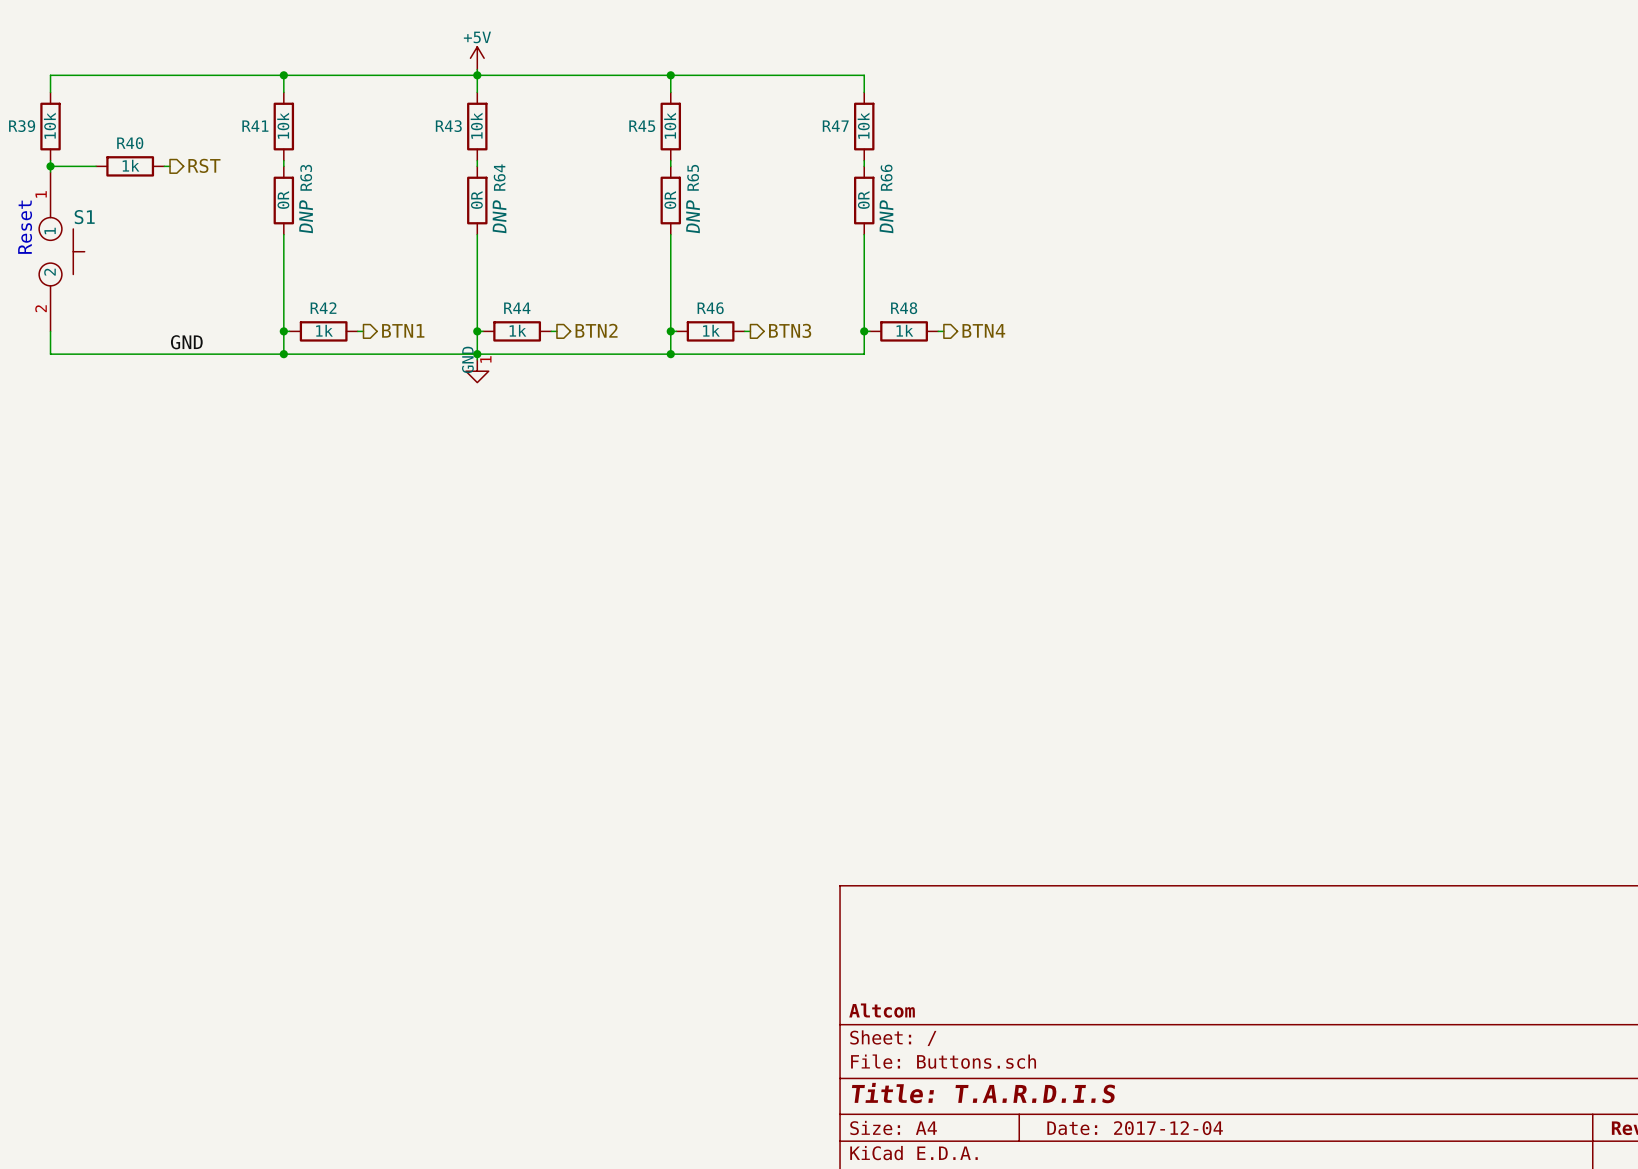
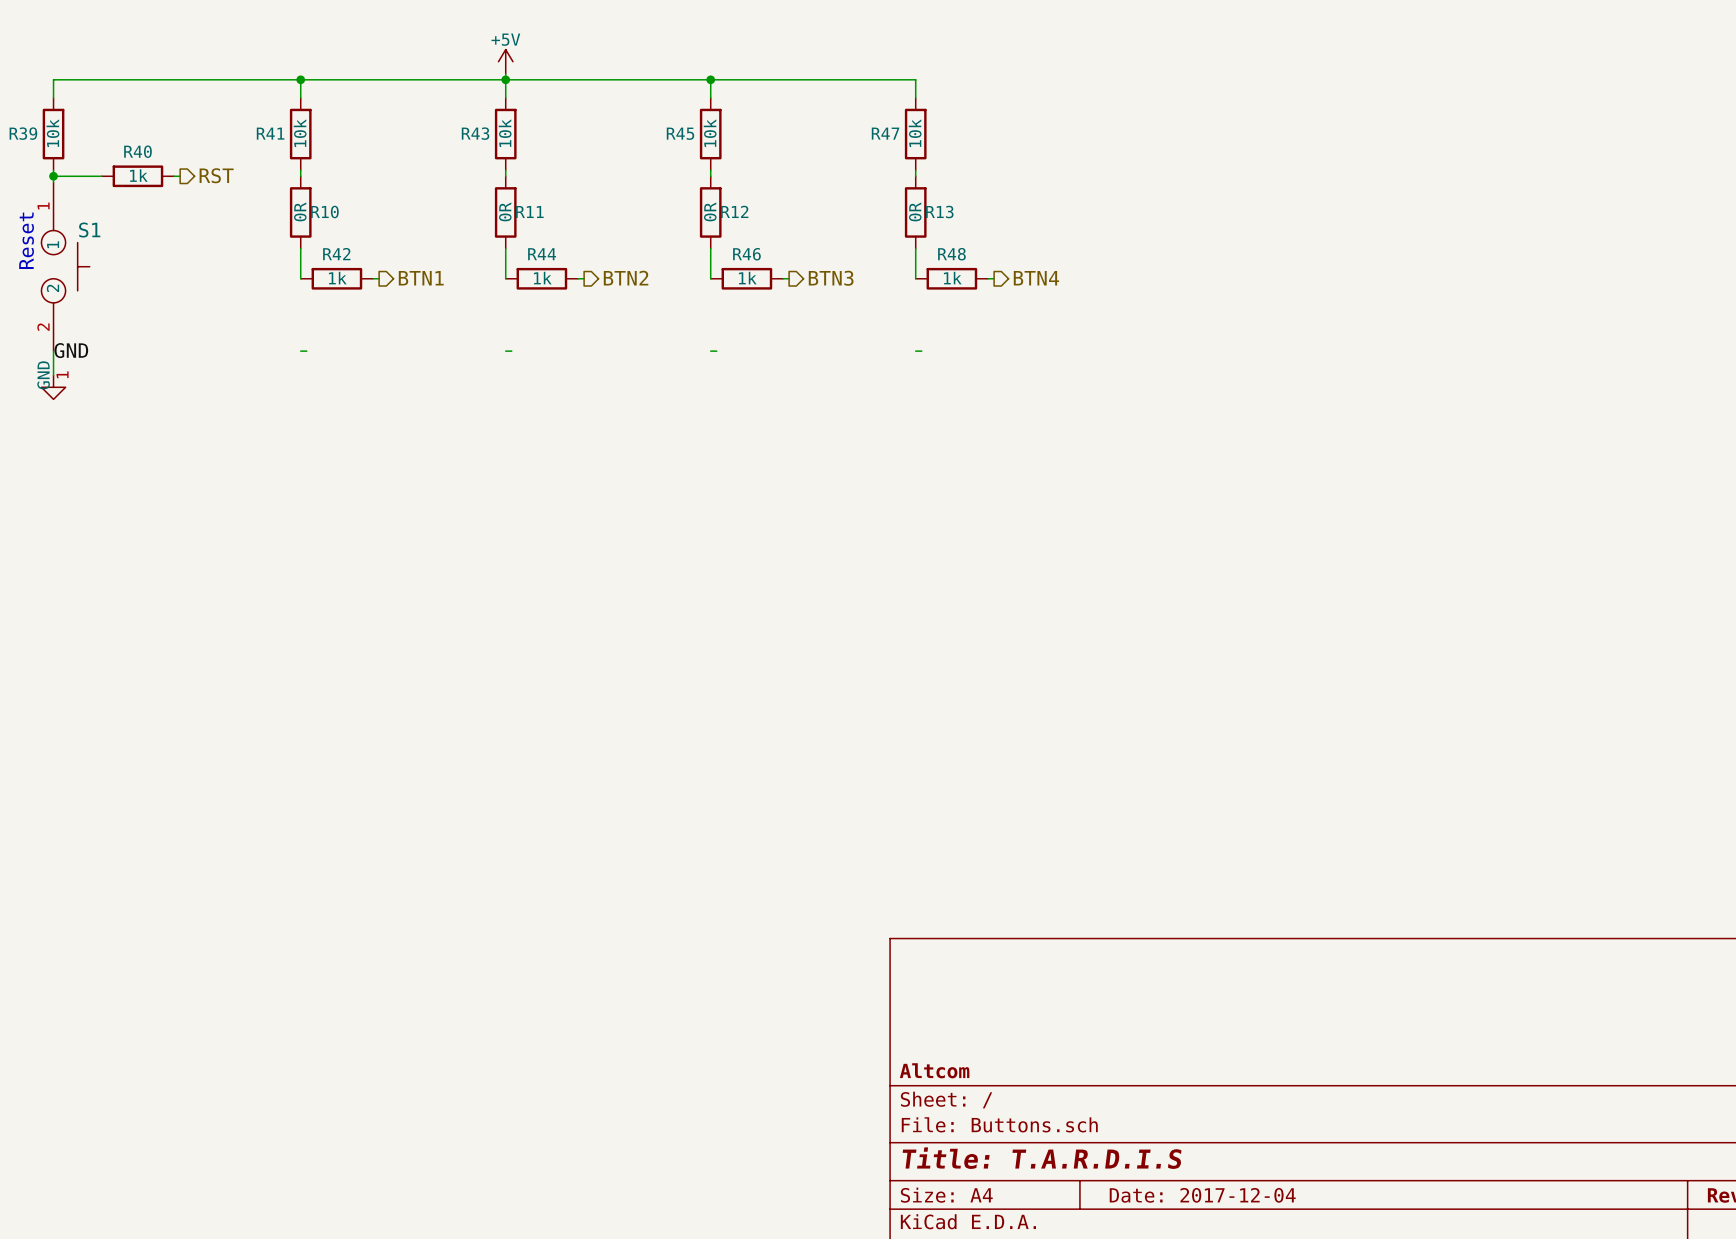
R63 name: R63 (306, 177) -> R10 (324, 212)
R64 name: R64 (499, 177) -> R11 (529, 212)
R65 name: R65 (693, 177) -> R12 (734, 211)
R66 name: R66 (886, 177) -> R13 (939, 212)
R63 text: DNP (306, 216) -> none
R64 text: DNP (499, 216) -> none
R65 text: DNP (693, 216) -> none
R66 text: DNP (886, 216) -> none
wire: (283, 263) (283, 354) -> none
wire: (477, 263) (477, 359) -> none
wire: (670, 263) (670, 354) -> none
wire: (864, 263) (864, 354) (50, 354) -> none
hierarchical label position: BTN1 (403, 330) -> BTN1 (421, 278)
hierarchical label position: BTN2 (596, 330) -> BTN2 (626, 278)
hierarchical label position: BTN3 (790, 330) -> BTN3 (831, 278)
hierarchical label position: BTN4 (983, 330) -> BTN4 (1036, 278)
junction: (283, 331) -> none
R42 position: (323, 331) -> (336, 278)
wire: (357, 331) (363, 331) -> (373, 278) (379, 278)
junction: (477, 331) -> none
R44 position: (517, 331) -> (541, 278)
wire: (551, 331) (556, 331) -> (578, 278) (584, 278)
junction: (670, 331) -> none
R46 position: (710, 331) -> (746, 278)
wire: (744, 331) (750, 331) -> (783, 278) (789, 278)
junction: (864, 331) -> none
R48 position: (904, 331) -> (951, 278)
wire: (938, 331) (943, 331) -> (988, 278) (994, 278)
label position: GND (186, 342) -> GND (71, 350)
junction: (283, 354) -> none
junction: (477, 354) -> none
junction: (670, 354) -> none
power symbol: none -> (53, 387)
power symbol: (477, 371) -> none

